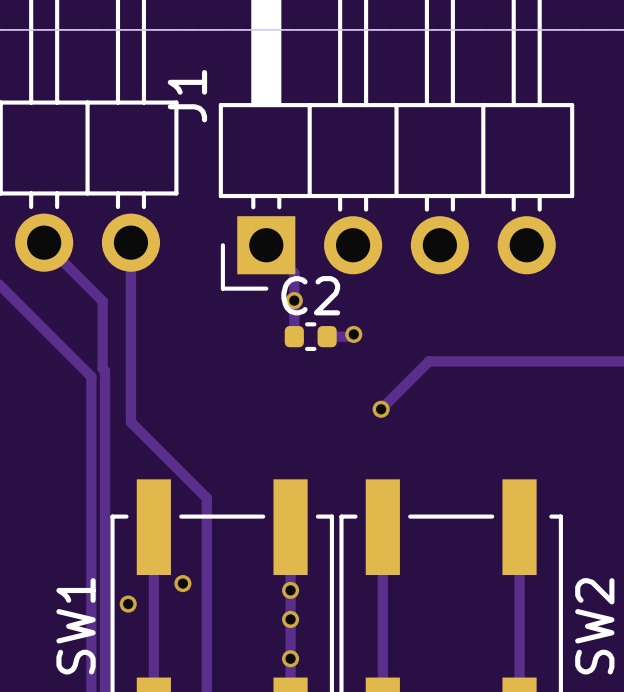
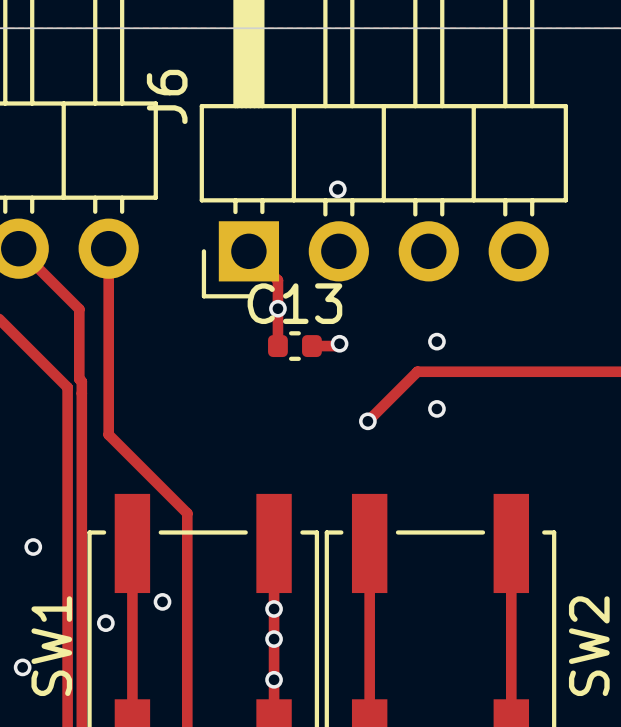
J1 name: J1 (187, 96) -> J6 (167, 96)
via: none -> (337, 189)
C2 name: C2 (310, 295) -> C13 (294, 303)
via: none -> (436, 341)
via: none -> (436, 408)
via: none -> (33, 547)
via: none -> (22, 667)

